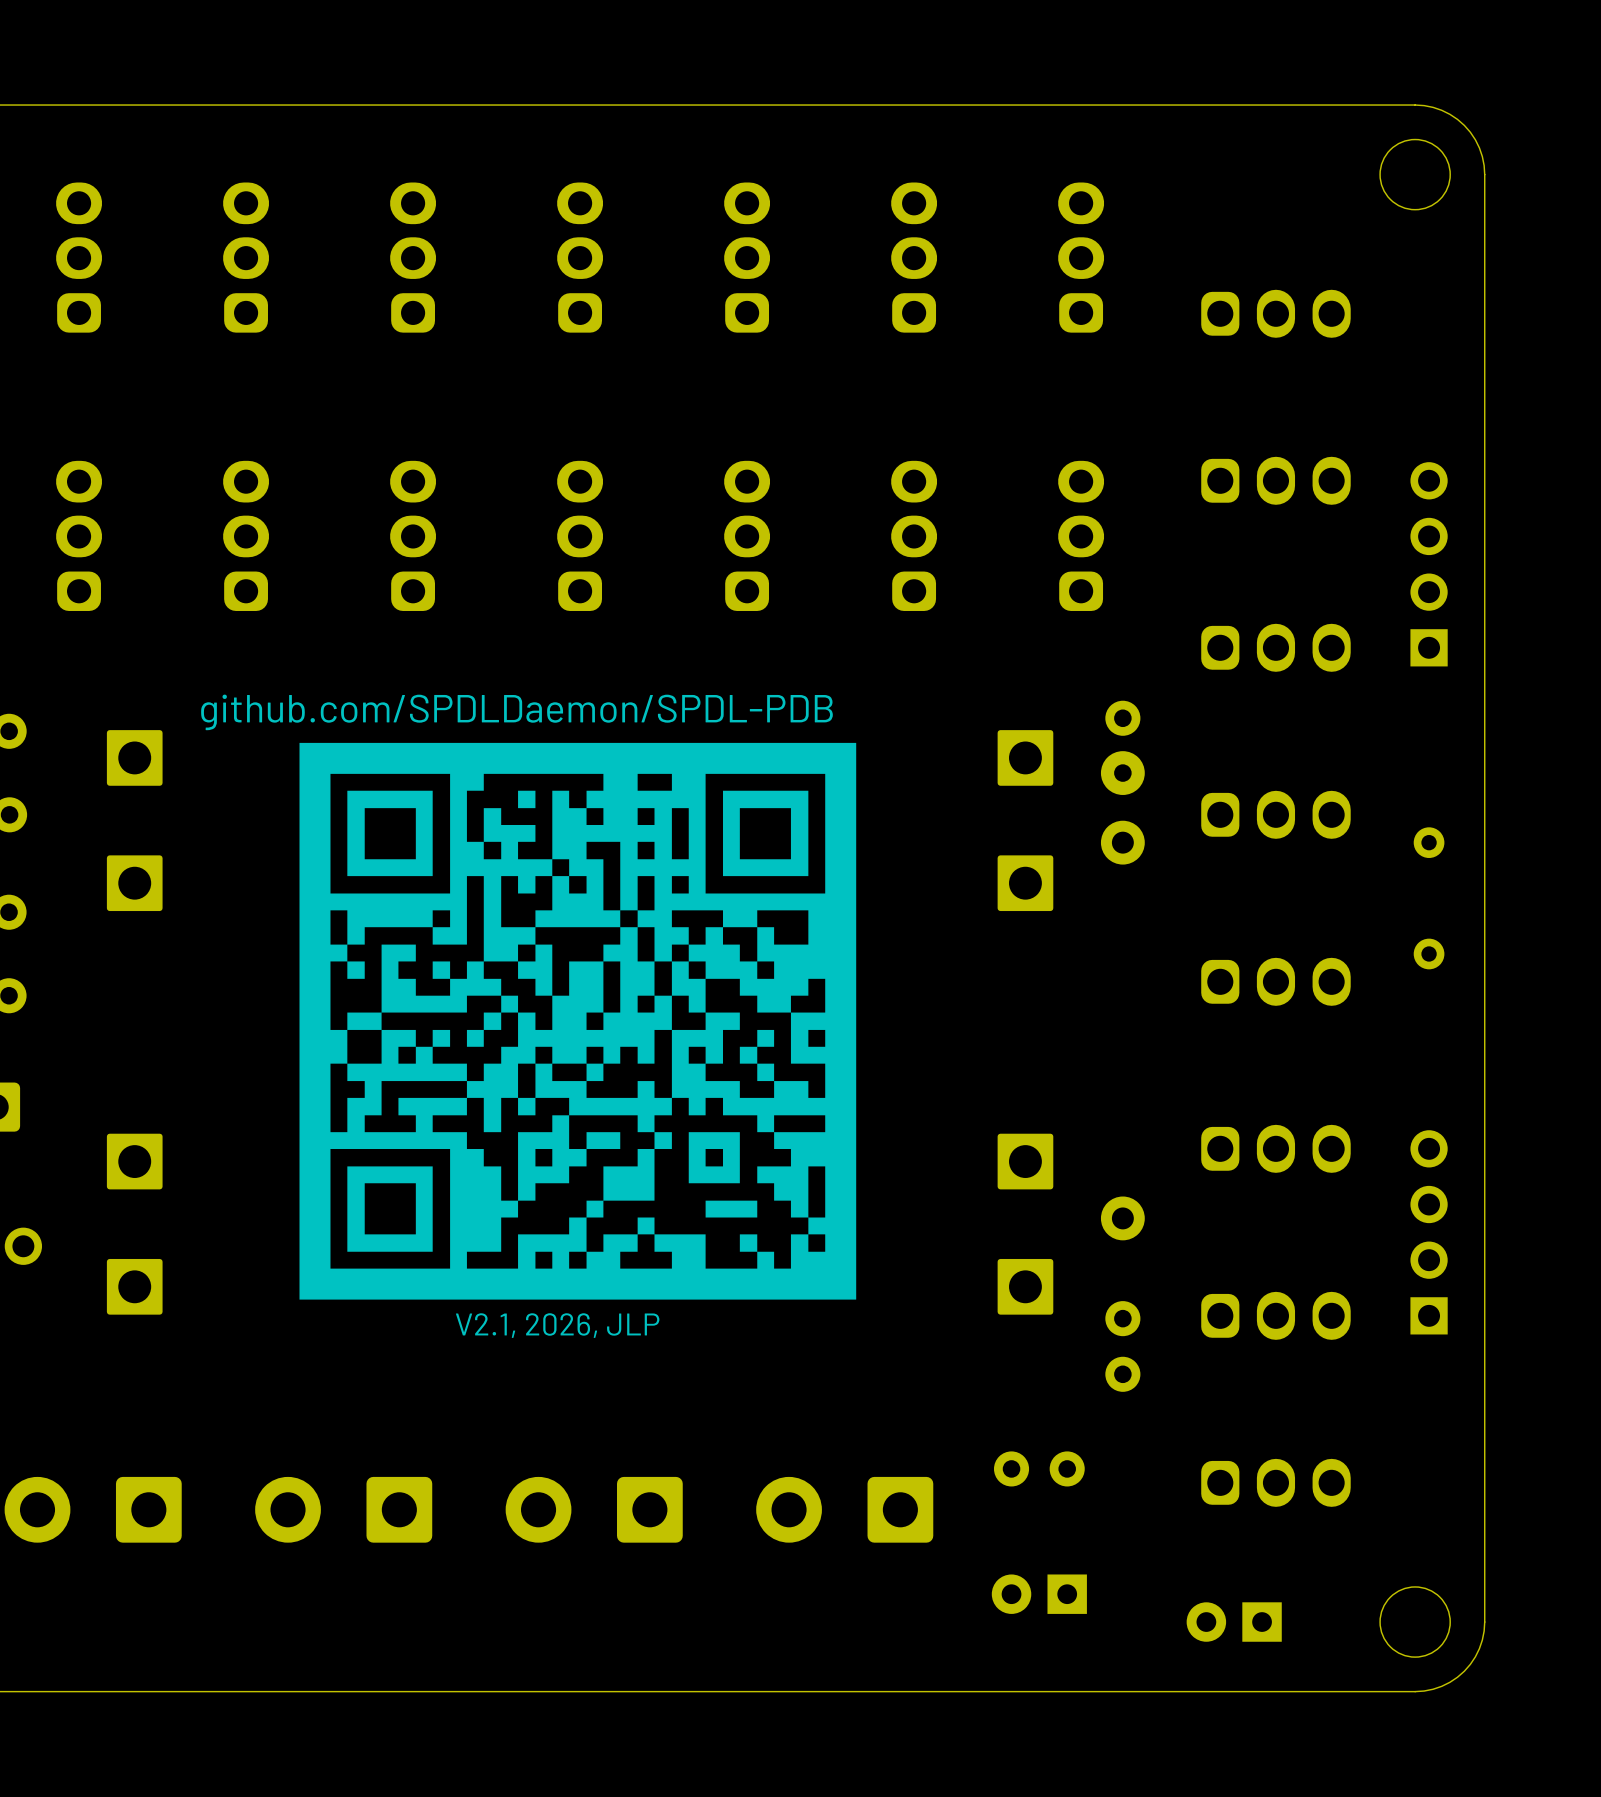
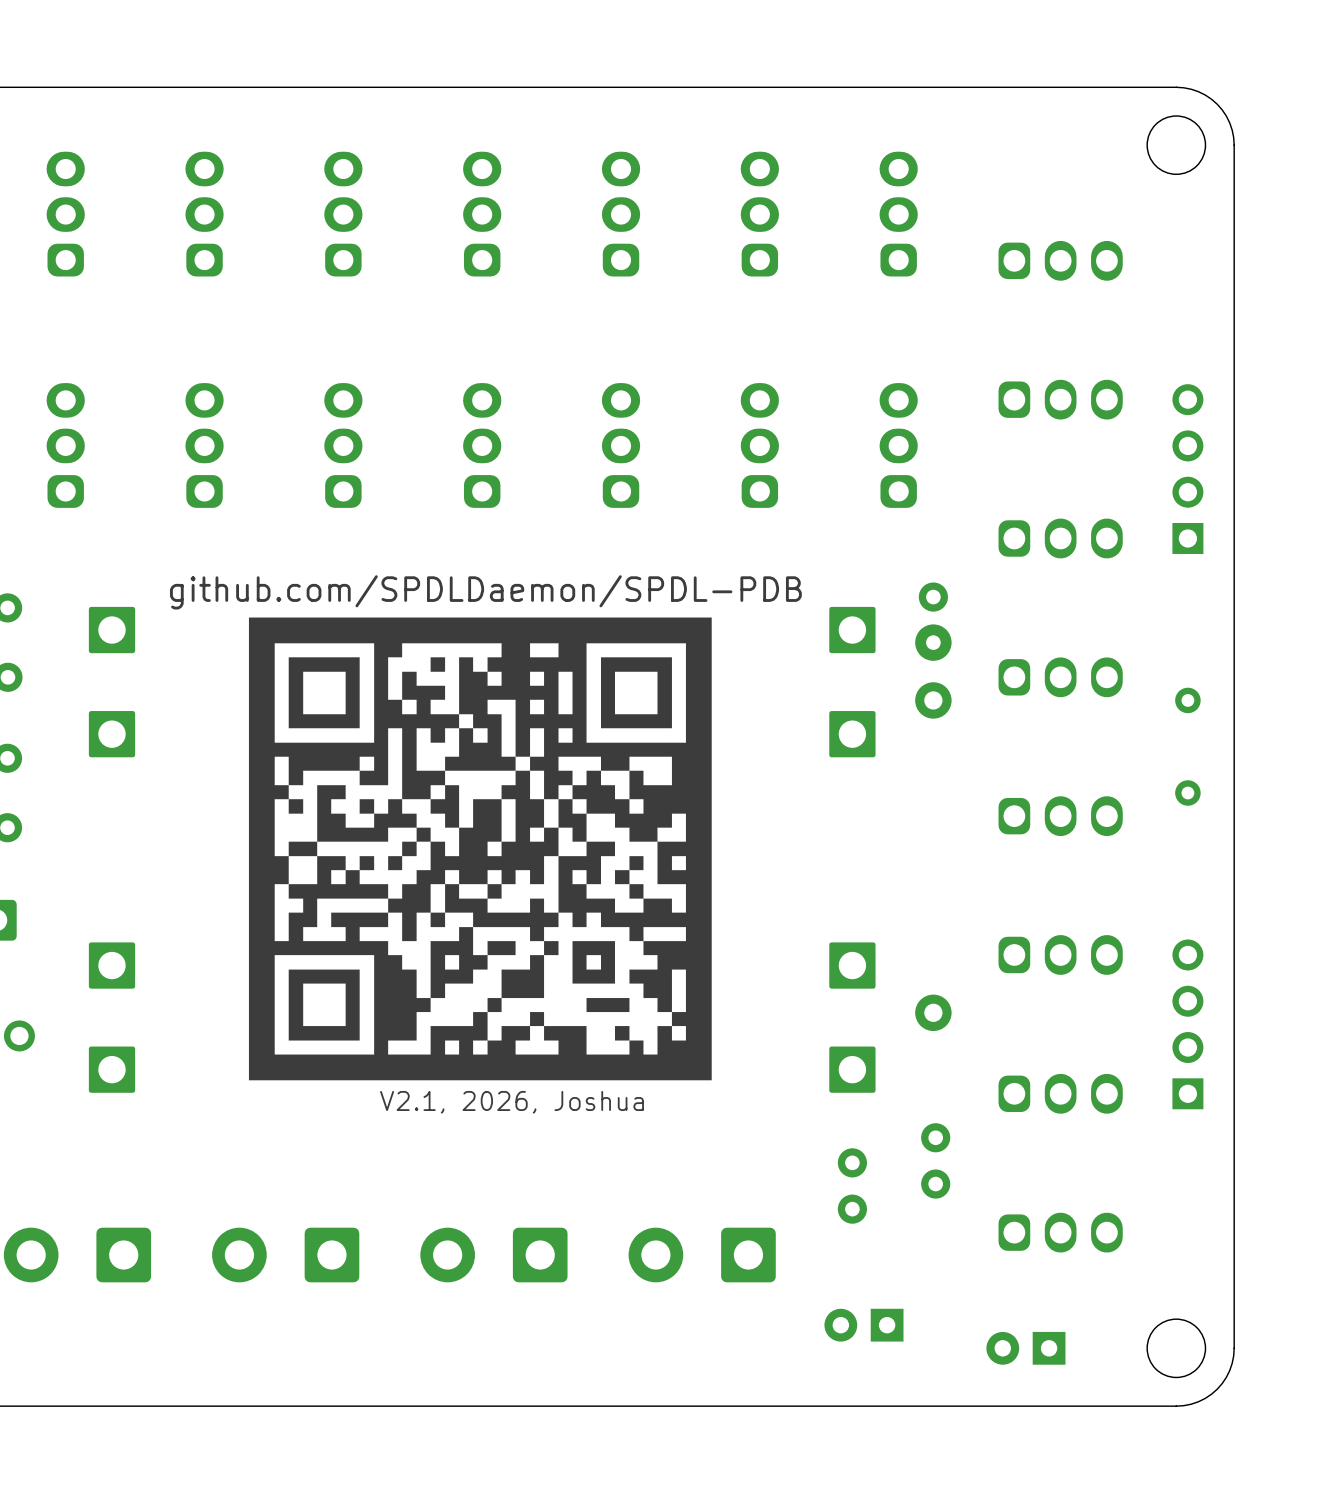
text: V2.1, 2026, JLP (557, 1325) -> V2.1, 2026, Joshua (512, 1102)
part position: (1122, 1346) -> (935, 1160)
part rotation: 0° (1039, 1468) -> 90° clockwise (852, 1186)

